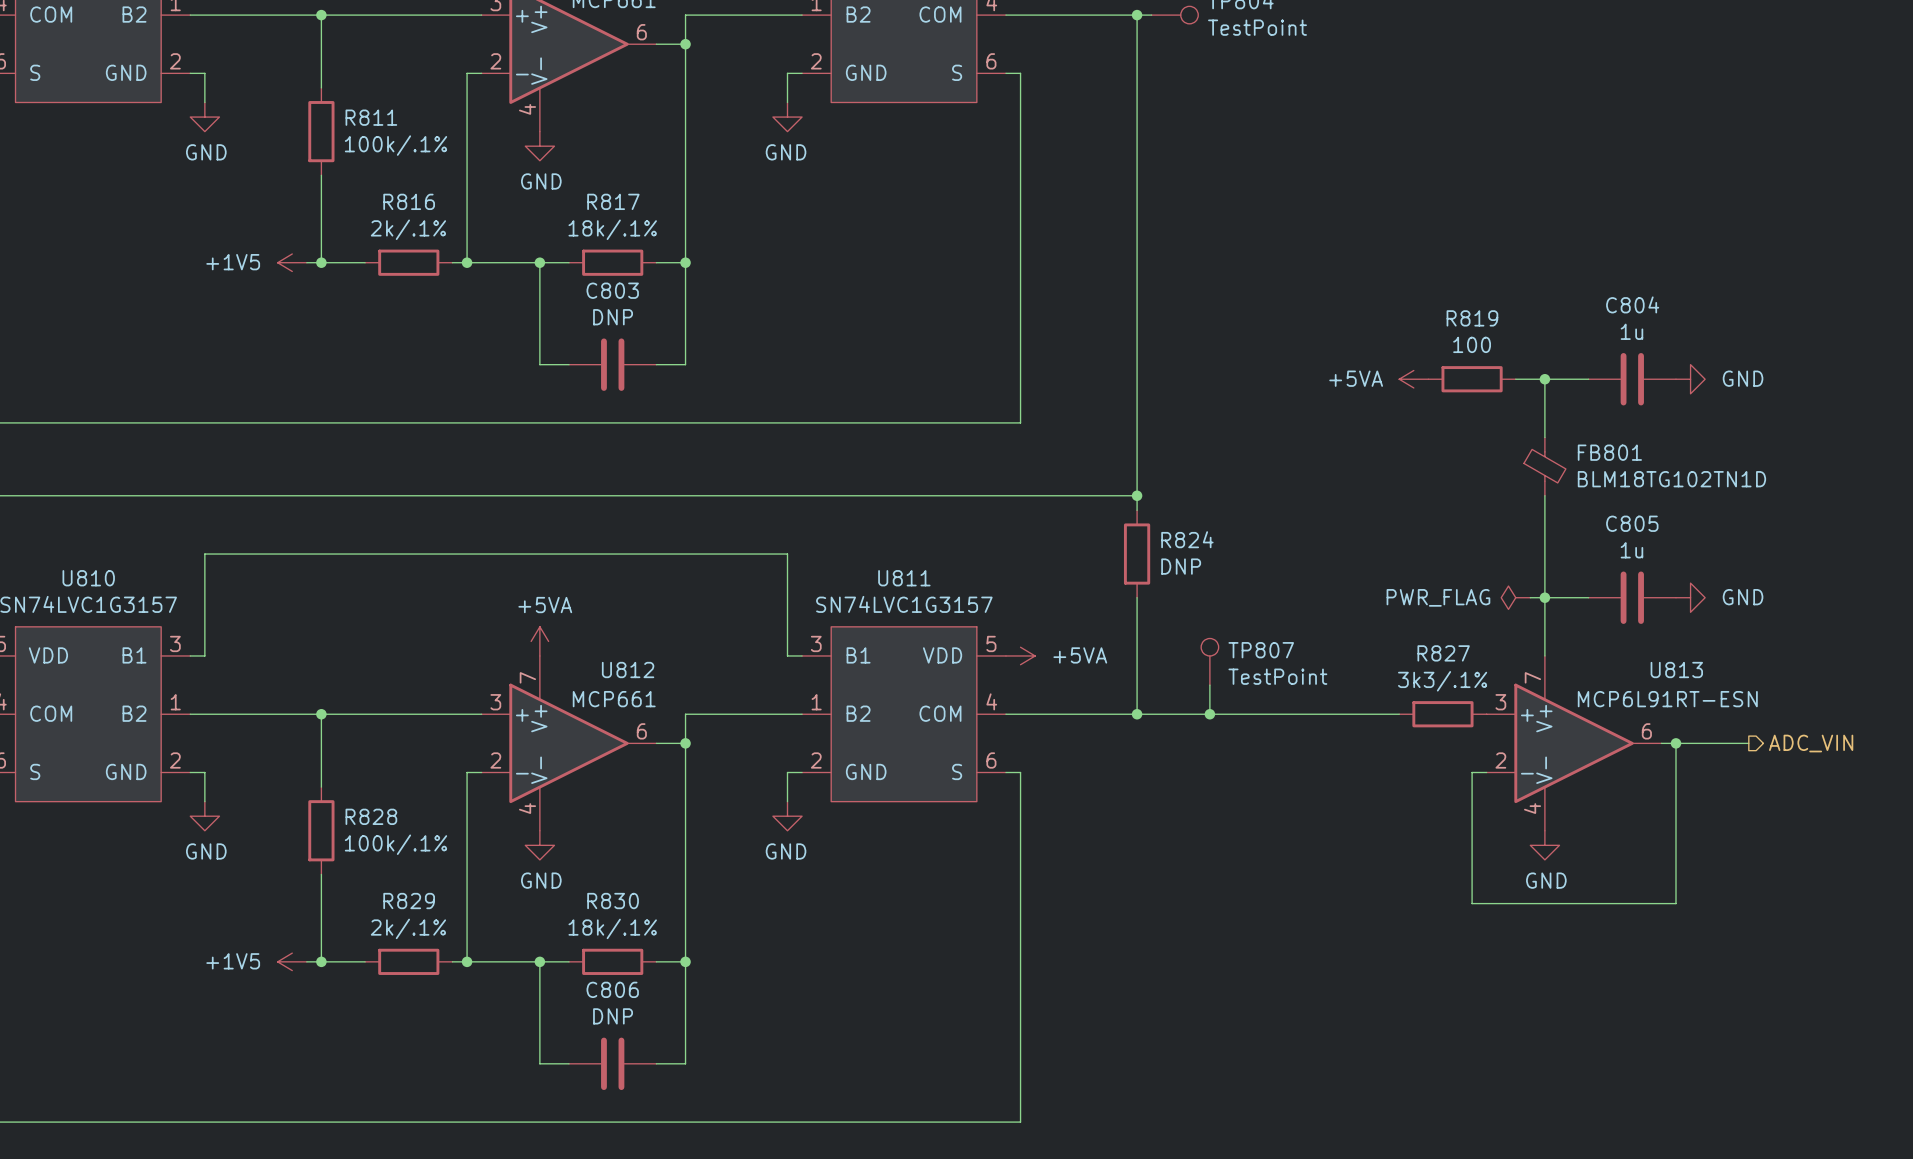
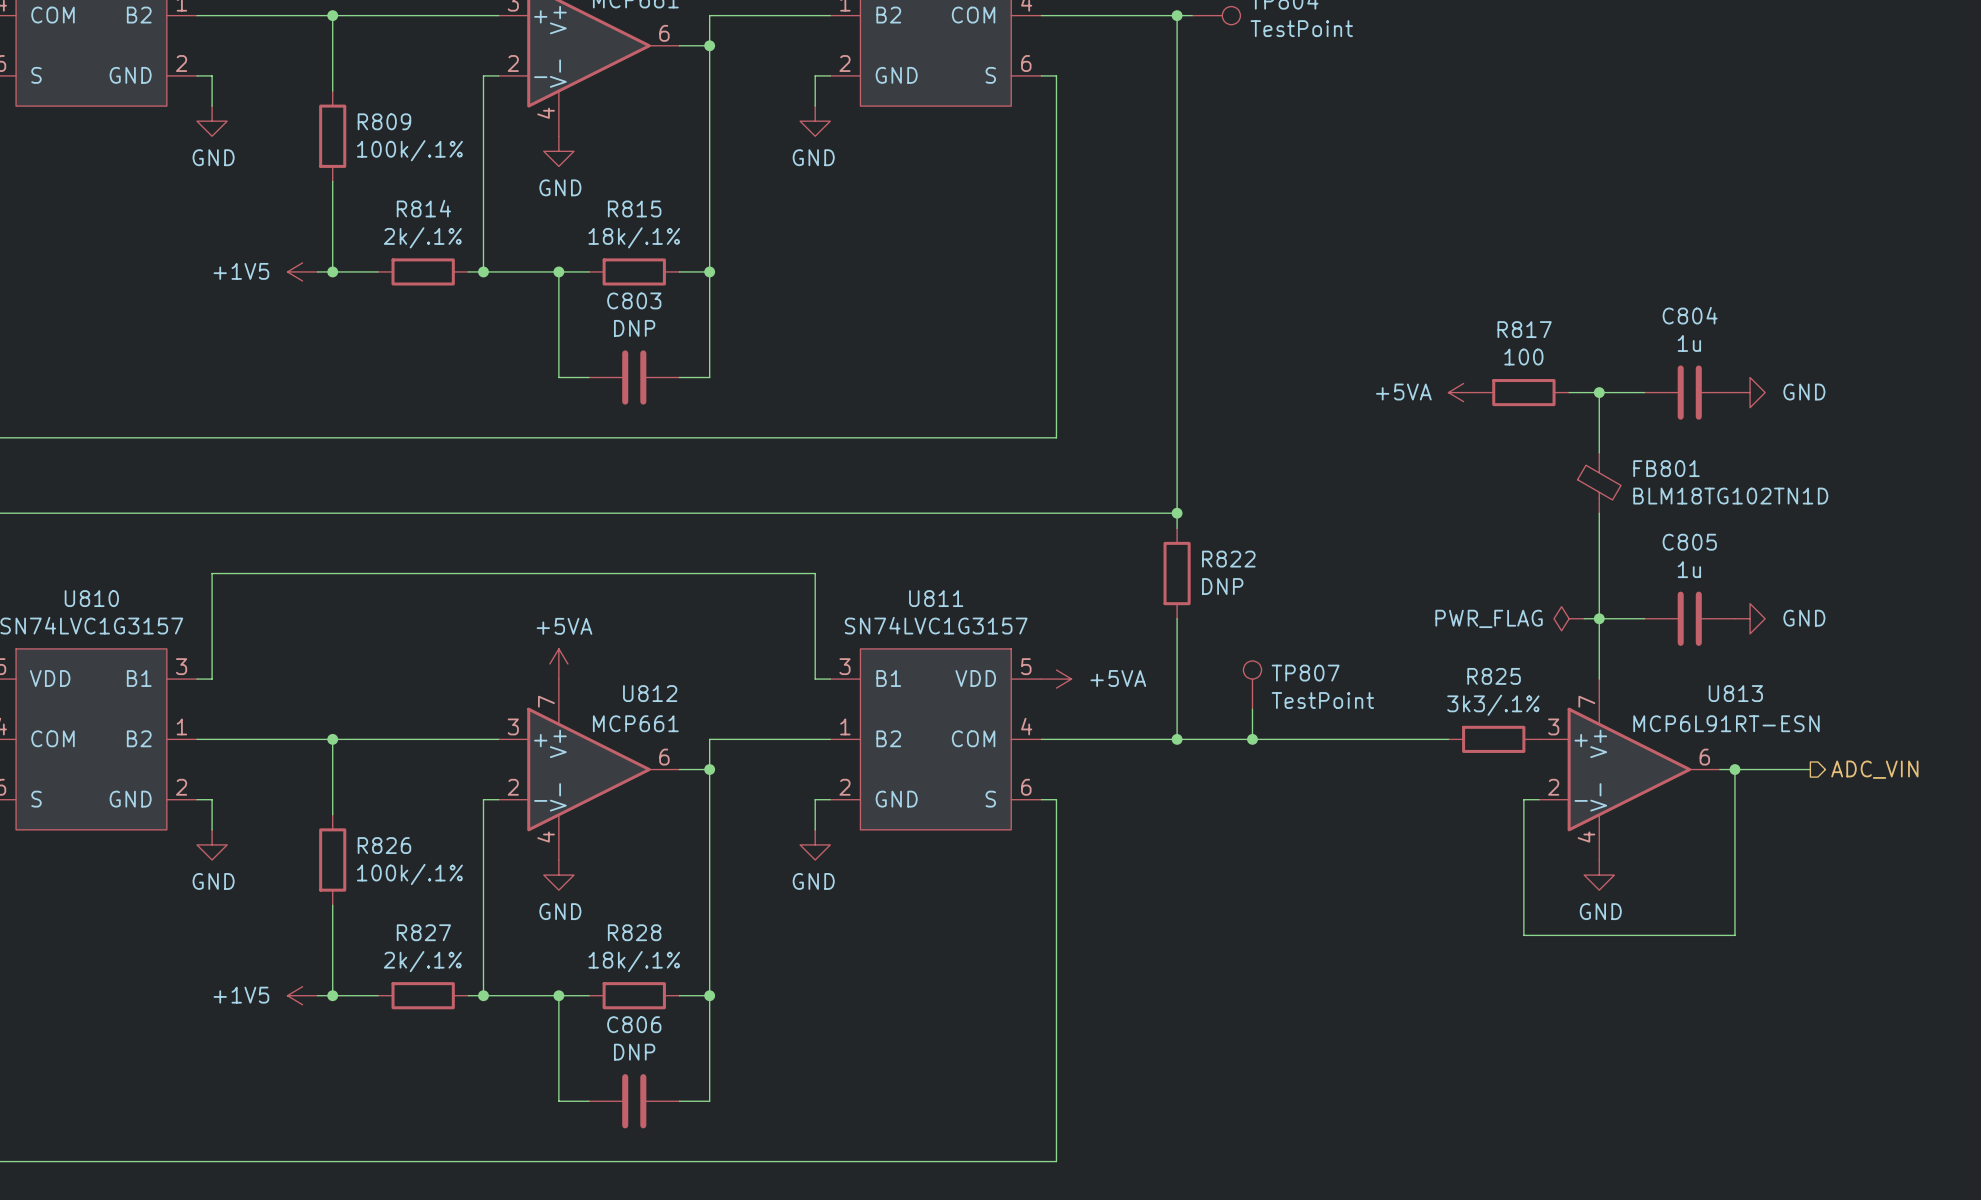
R811 name: R811 (371, 117) -> R809 (384, 121)
R816 name: R816 (409, 201) -> R814 (423, 208)
R817 name: R817 (613, 201) -> R815 (634, 208)
R819 name: R819 (1472, 318) -> R817 (1524, 329)
R824 name: R824 (1187, 539) -> R822 (1228, 559)
R827 name: R827 (1443, 653) -> R825 (1494, 676)
R828 name: R828 (371, 816) -> R826 (384, 845)
R829 name: R829 (409, 901) -> R827 (423, 932)
R830 name: R830 (613, 901) -> R828 (634, 932)

